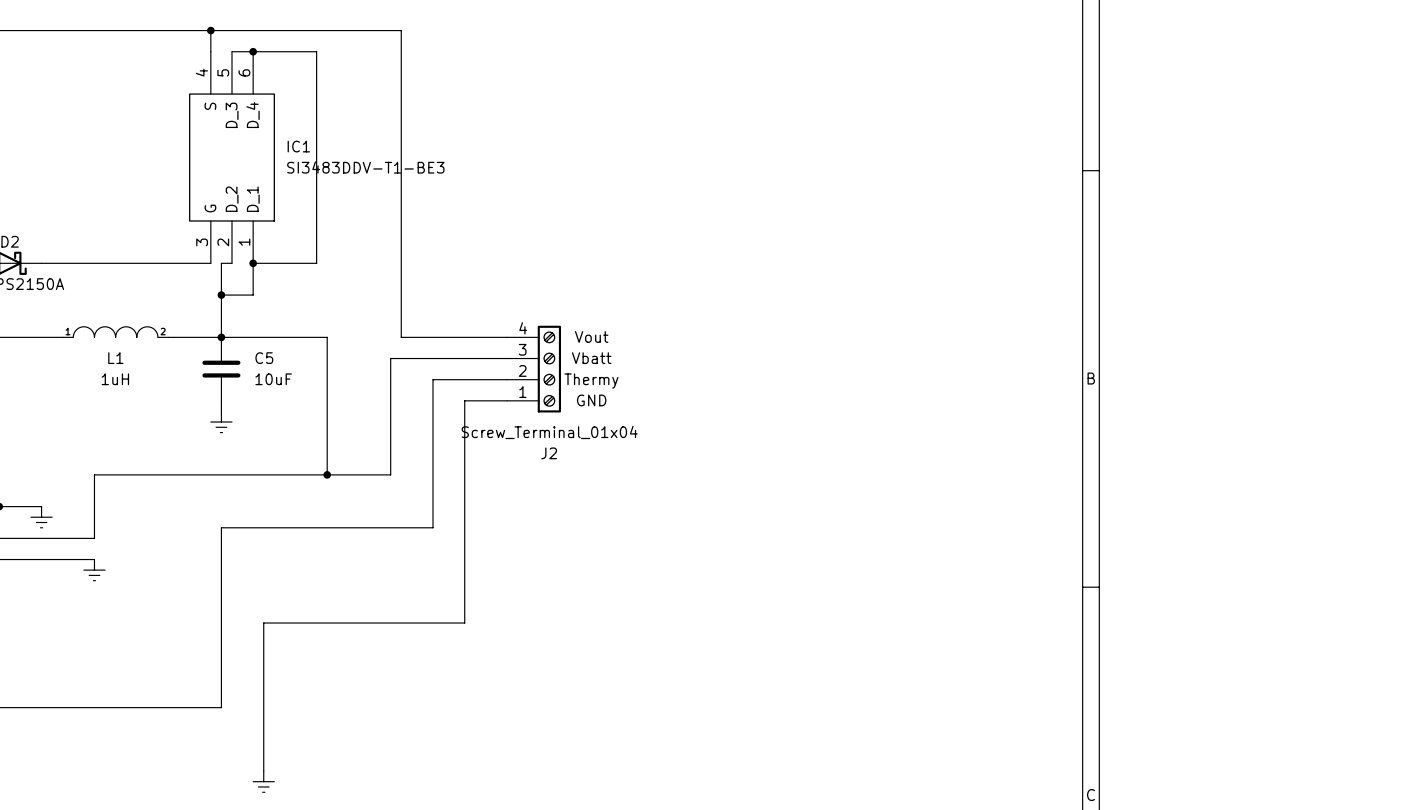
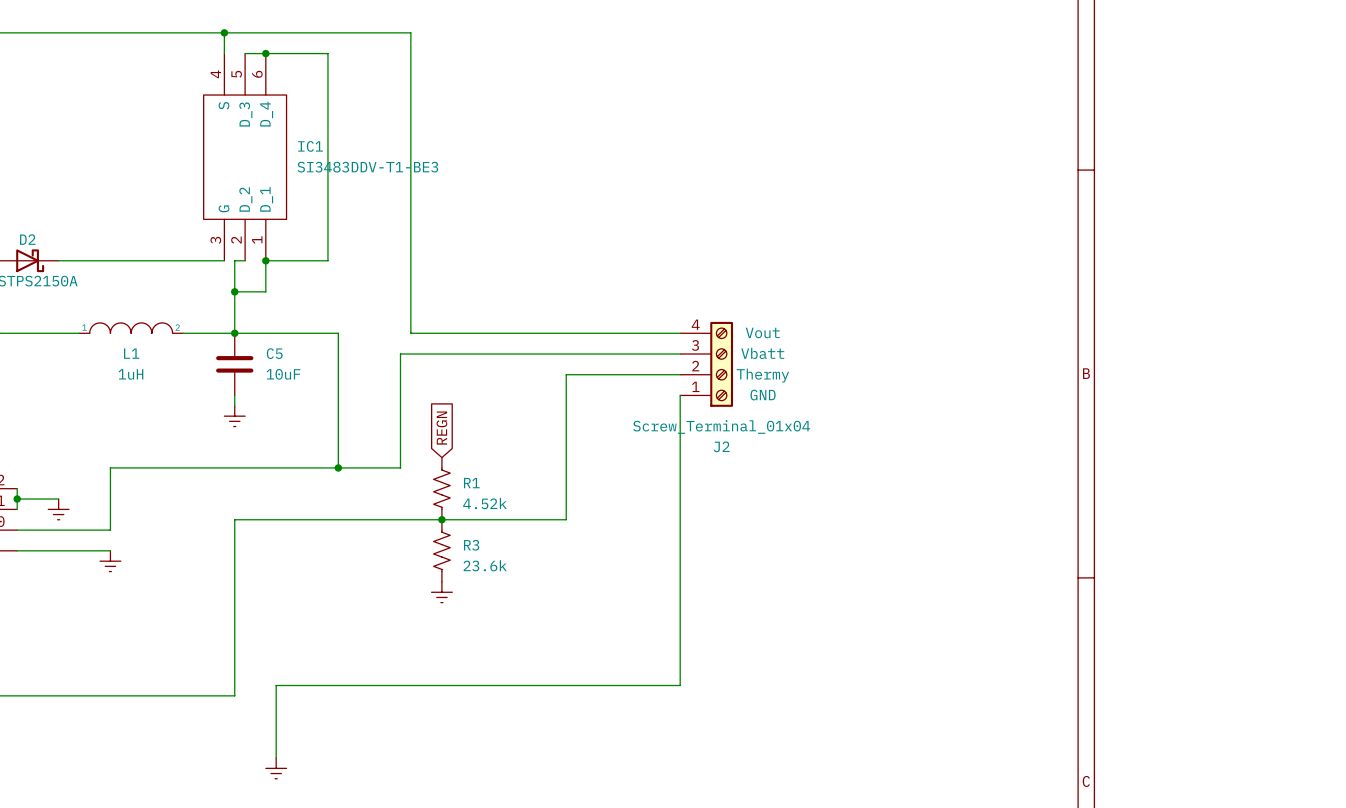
wire: none -> (514, 333) (680, 333)
wire: none -> (514, 354) (680, 354)
J2 position: (534, 369) -> (706, 364)
wire: (507, 379) (433, 379) (433, 527) -> (680, 374) (566, 374) (566, 519) (441, 519)
wire: (507, 400) (464, 400) (464, 623) (263, 623) (263, 697) -> (680, 395) (680, 685) (276, 685)
global label: none -> REGN (441, 428)
R1: none -> 4.52k (441, 488)
junction: none -> (441, 519)
R3: none -> 23.6k (441, 550)
power symbol: none -> (441, 592)

